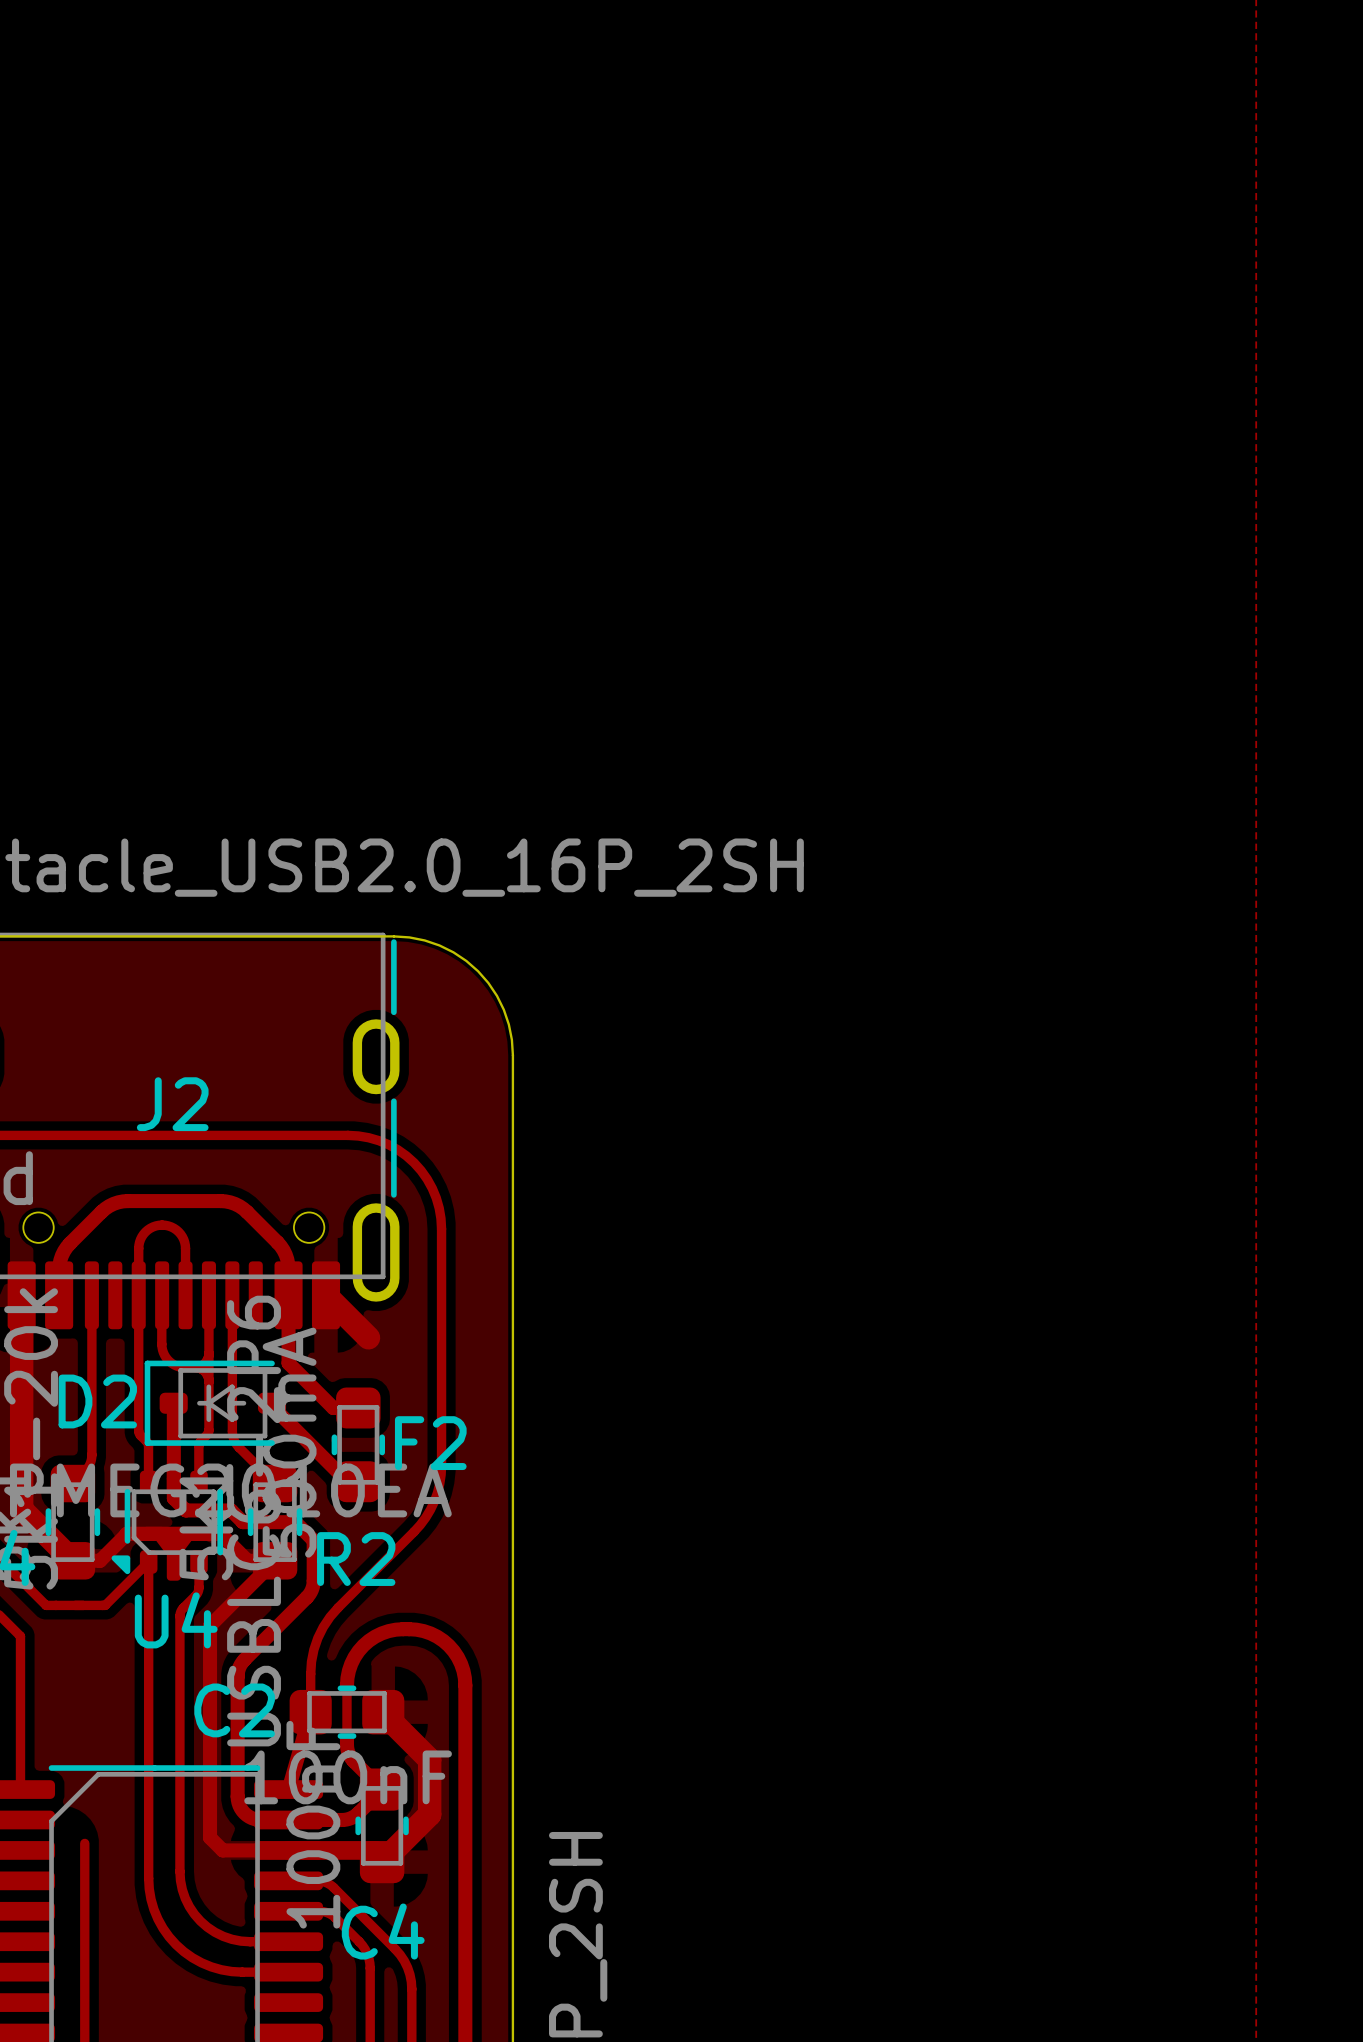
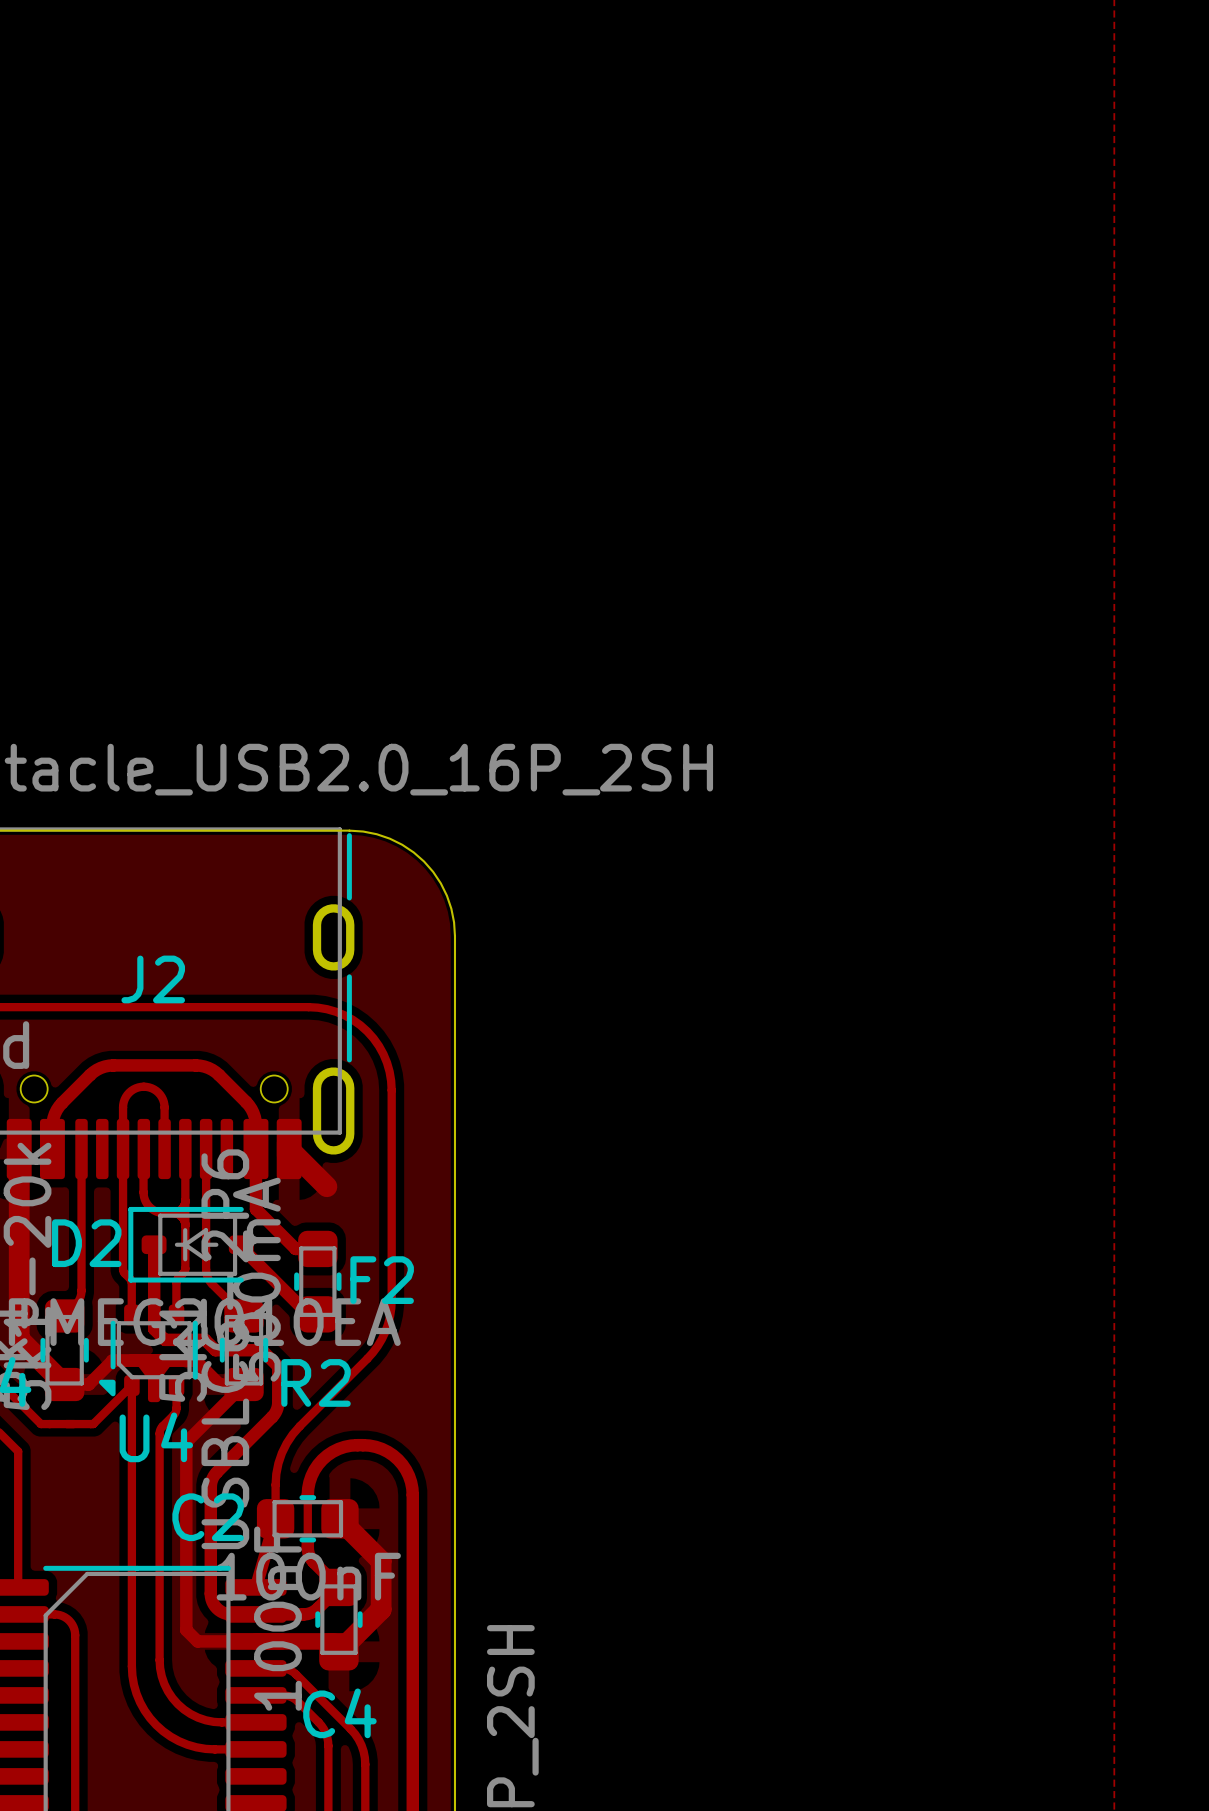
track: none -> (18, 1614) (62, 1616) (72, 1624) (75, 1635)

